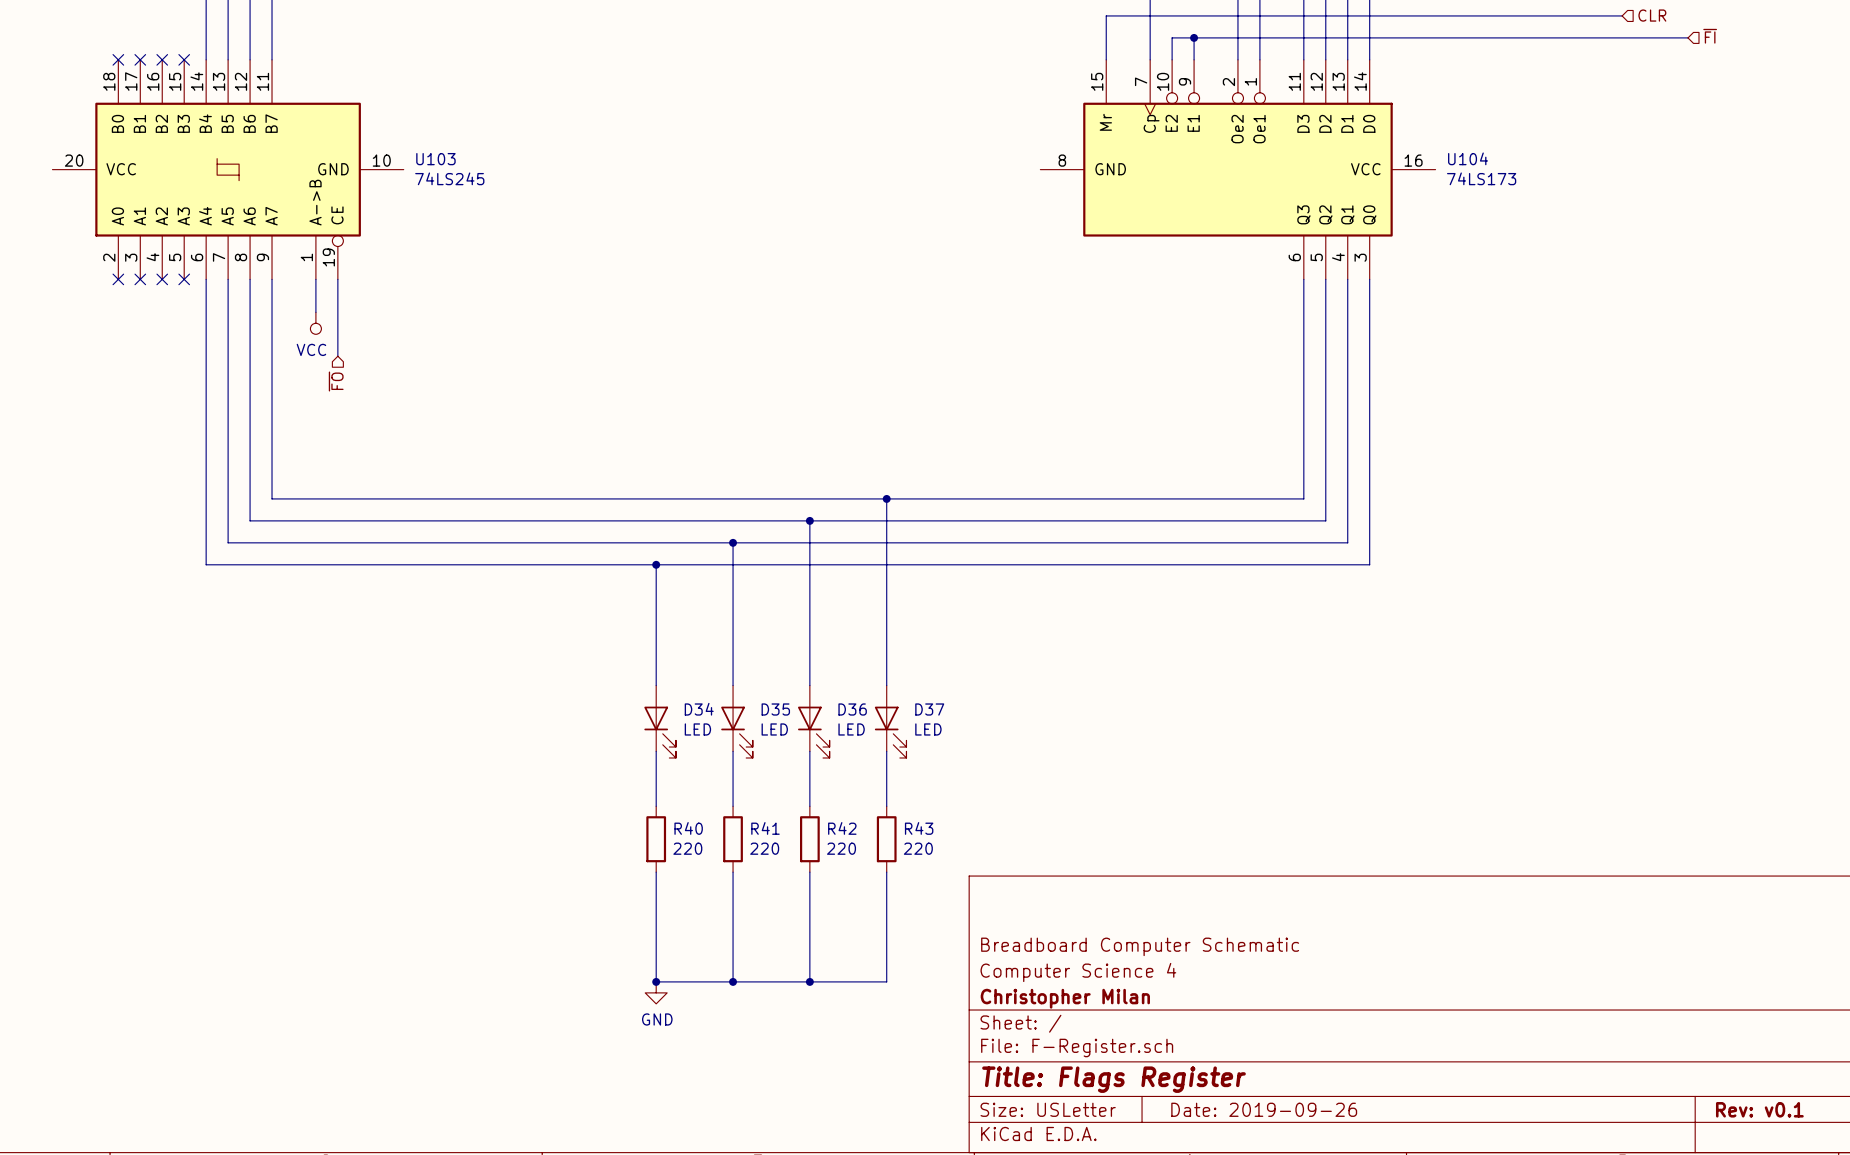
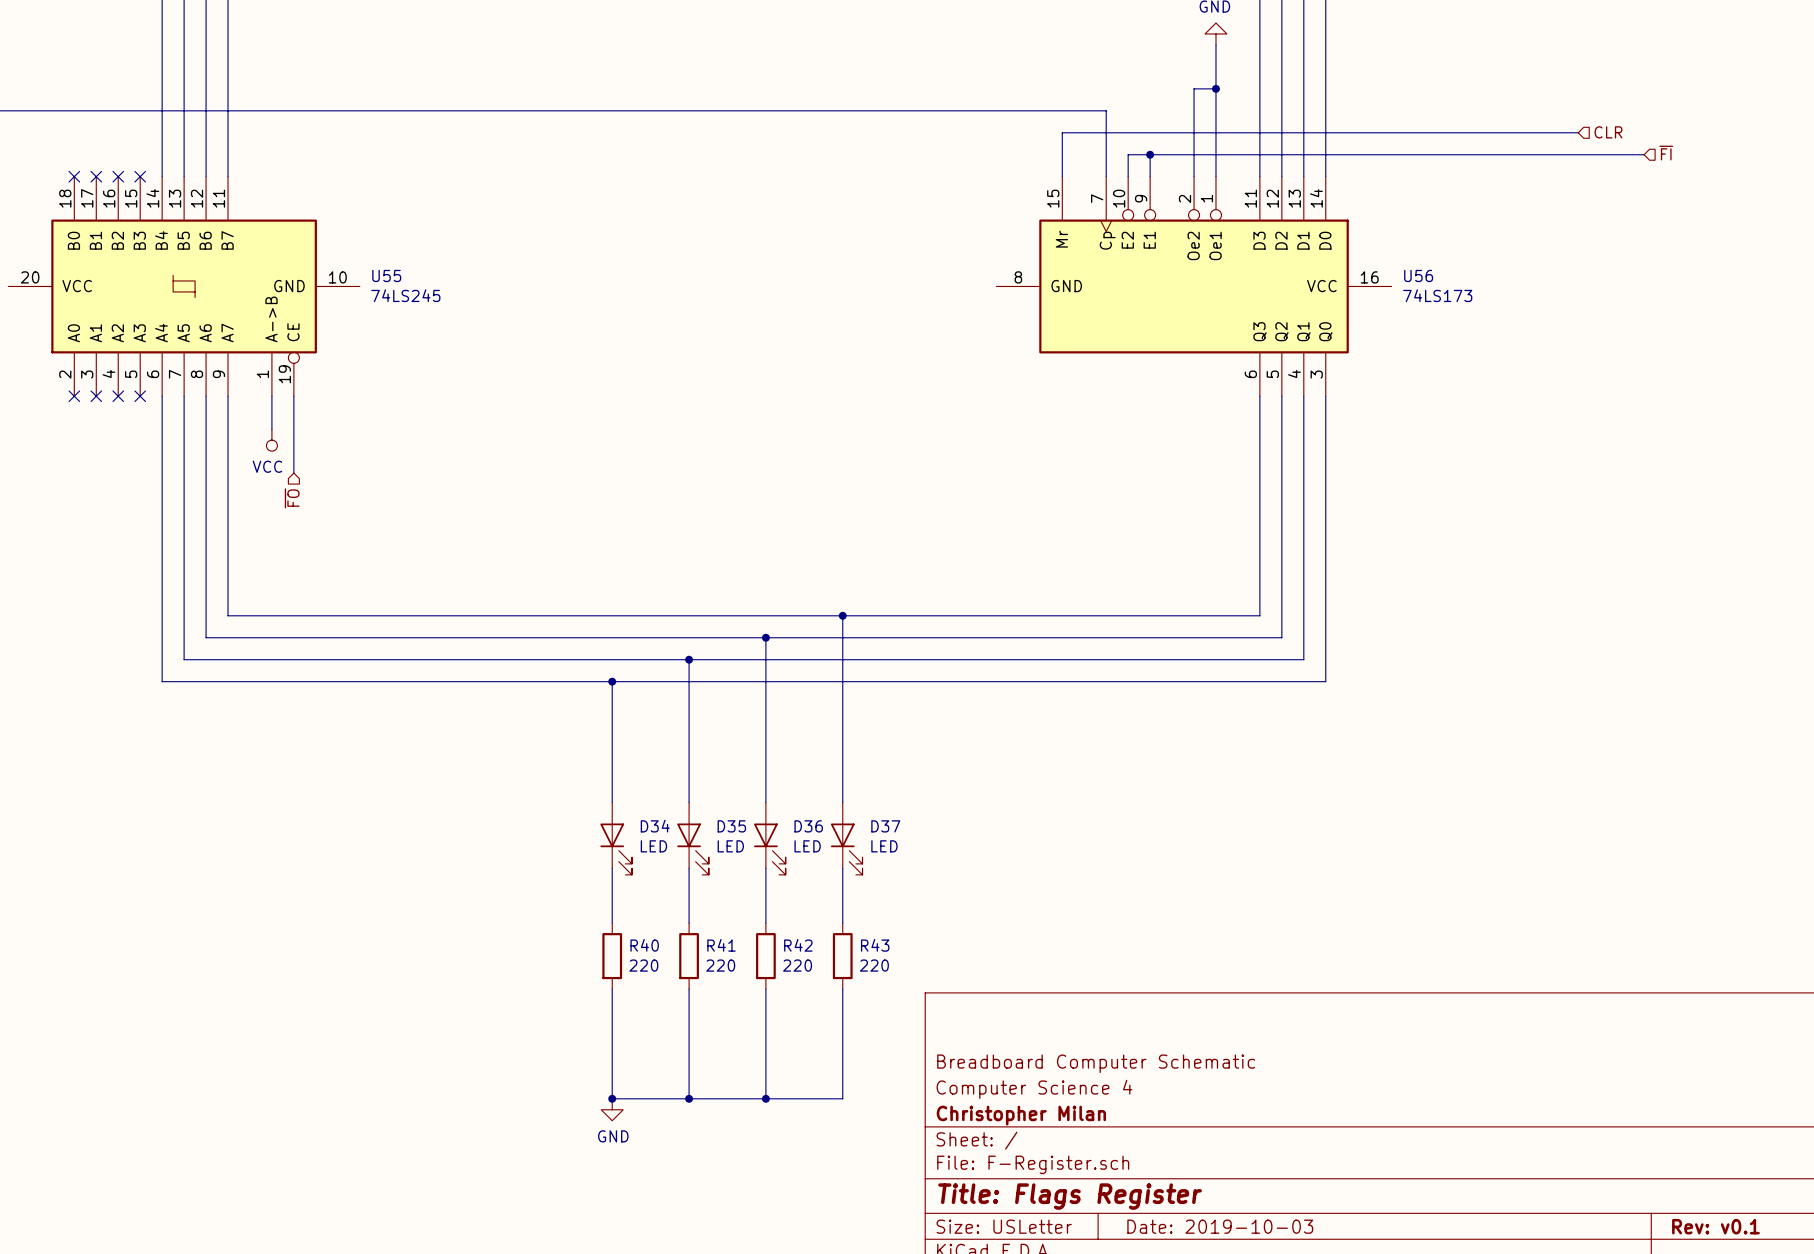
U104 name: U104 (1468, 158) -> U56 (1418, 275)
U103 name: U103 (435, 159) -> U55 (386, 275)
title block: Date: 2019-09-26 (1264, 1109) -> Date: 2019-10-03 (1220, 1226)

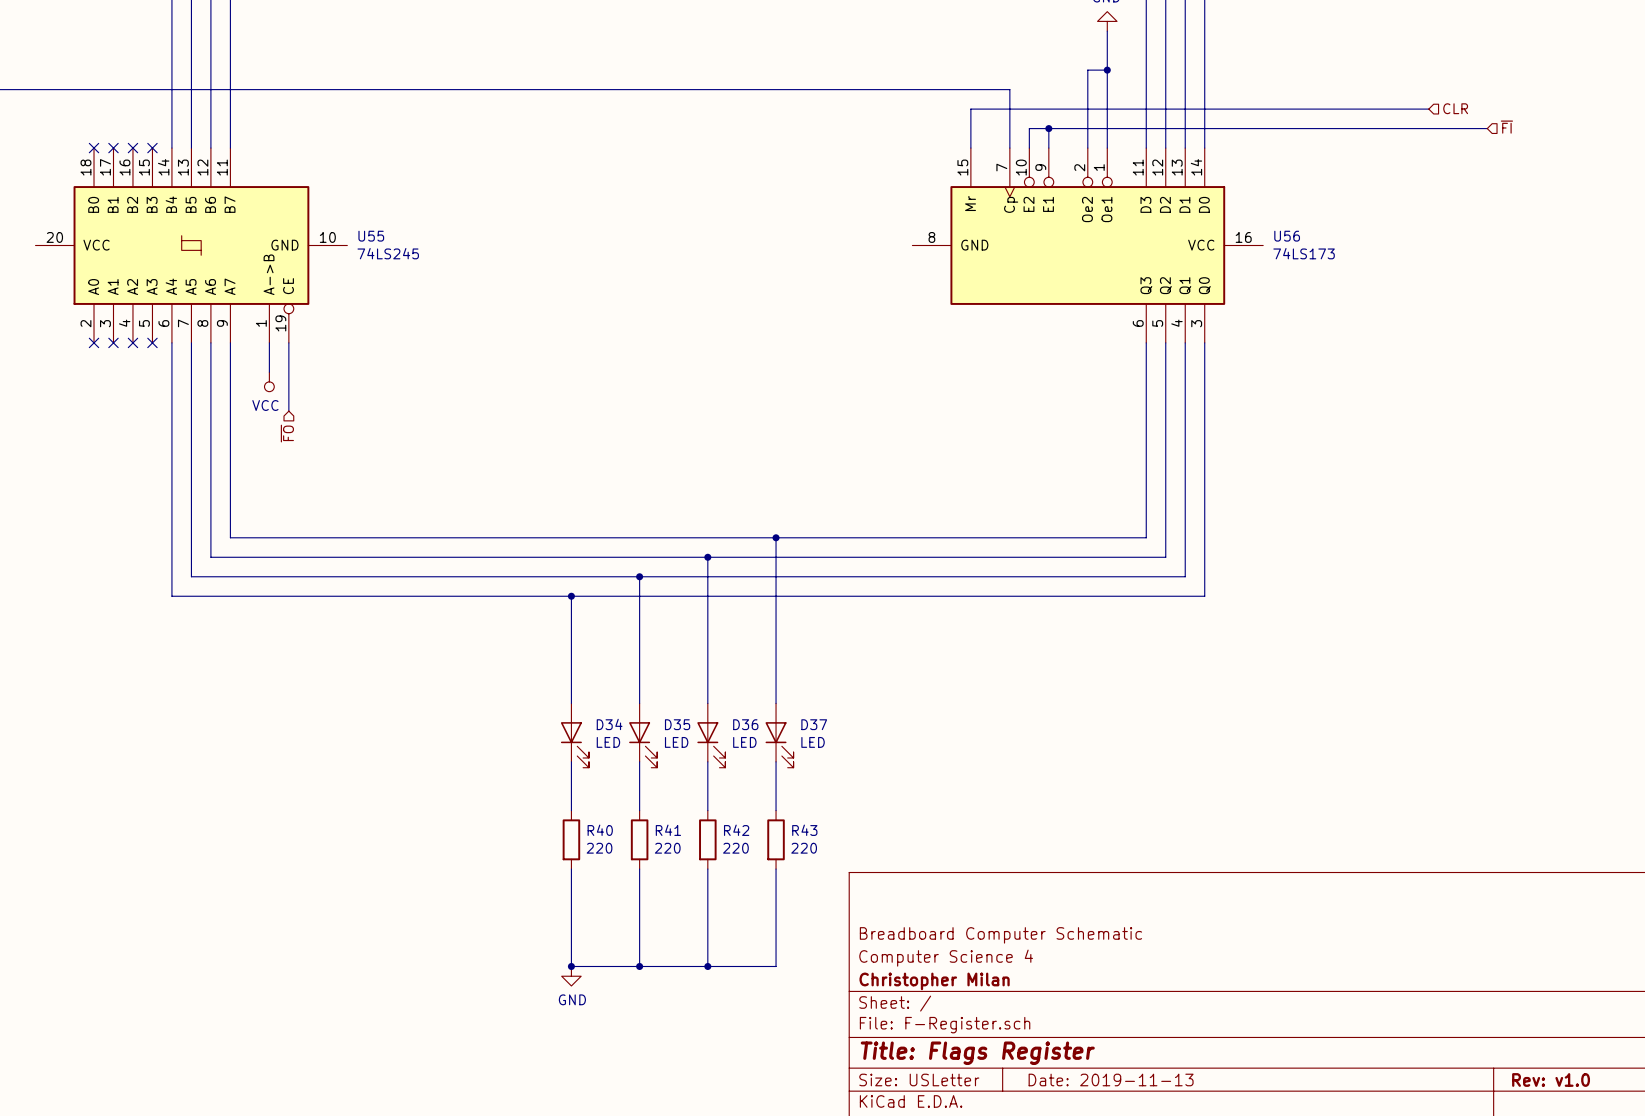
title block: Date: 2019-10-03 (1220, 1226) -> Date: 2019-11-13 (1111, 1079)
title block: Rev: v0.1 (1715, 1226) -> Rev: v1.0 (1551, 1079)

